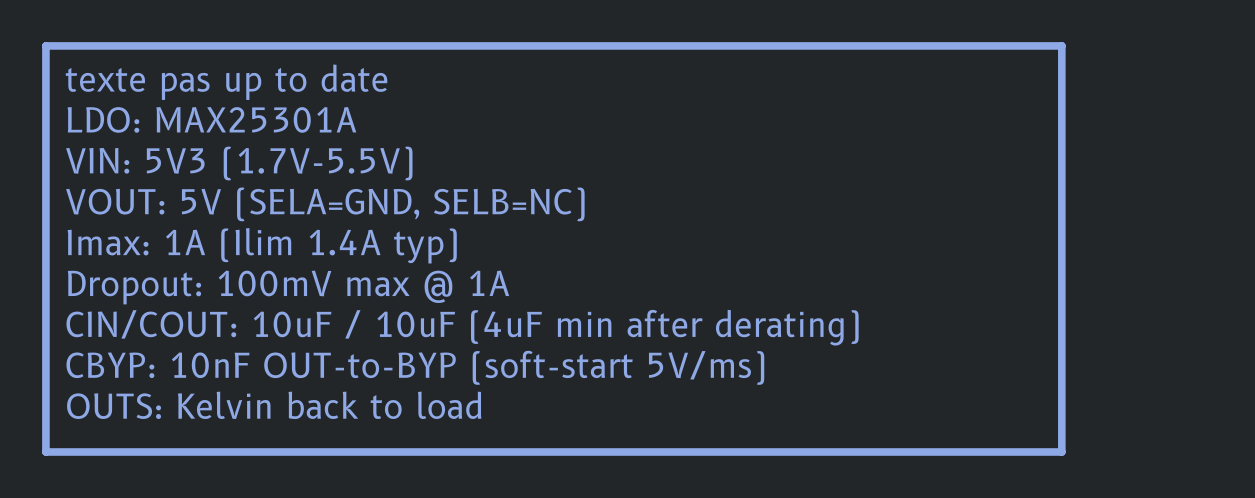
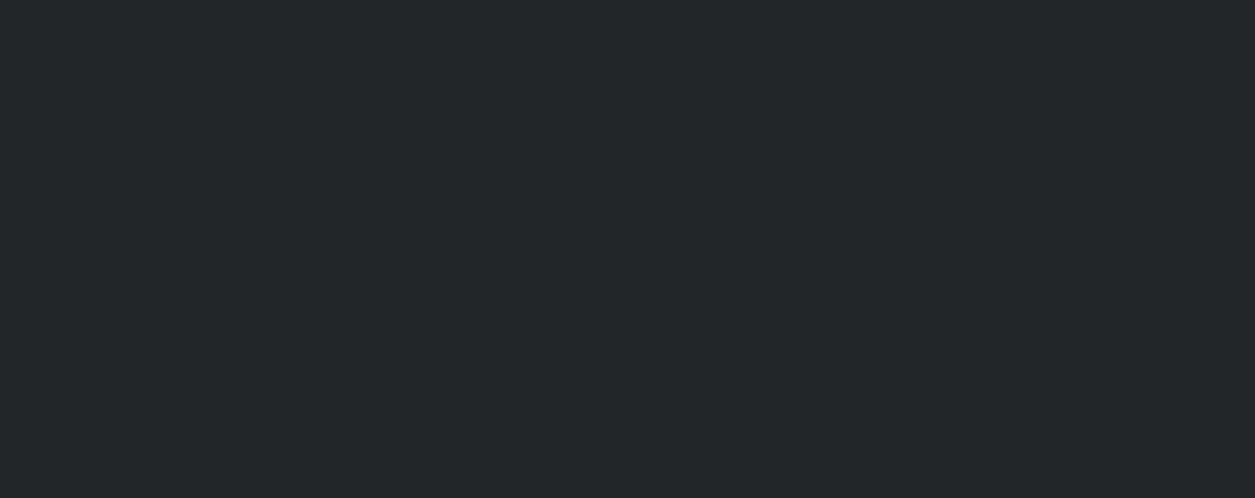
line: (45, 45) (1061, 45) (1061, 451) (45, 451) (45, 45) -> none
text: texte pas up to date (226, 82) -> none
text: LDO: MAX25301A (211, 119) -> none
text: VIN: 5V3 (1.7V-5.5V) (239, 163) -> none
text: VOUT: 5V (SELA=GND, SELB=NC) (325, 204) -> none
text: Imax: 1A (Ilim 1.4A typ) (262, 245) -> none
text: Dropout: 100mV max @ 1A (288, 287) -> none
text: CIN/COUT: 10uF / 10uF (4uF min after derating) (462, 327) -> none
text: CBYP: 10nF OUT-to-BYP (soft-start 5V/ms) (415, 367) -> none
text: OUTS: Kelvin back to load (274, 405) -> none

